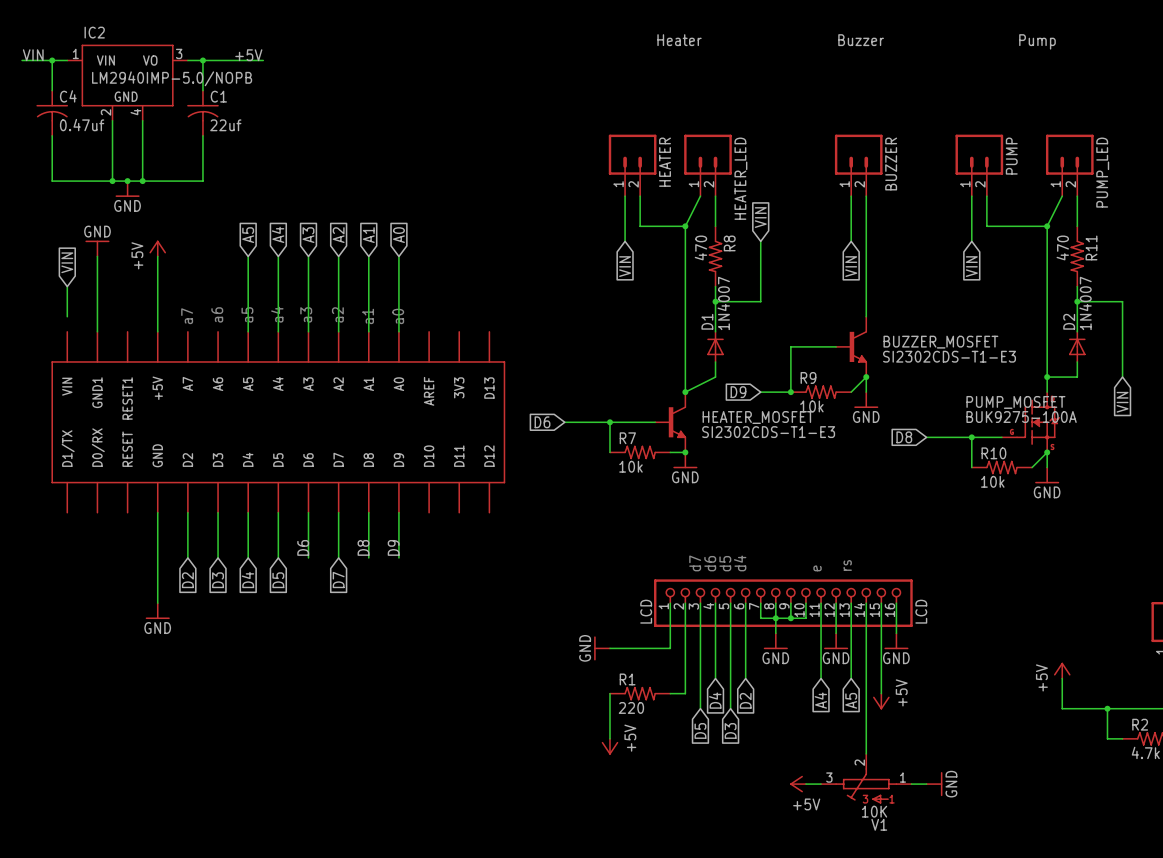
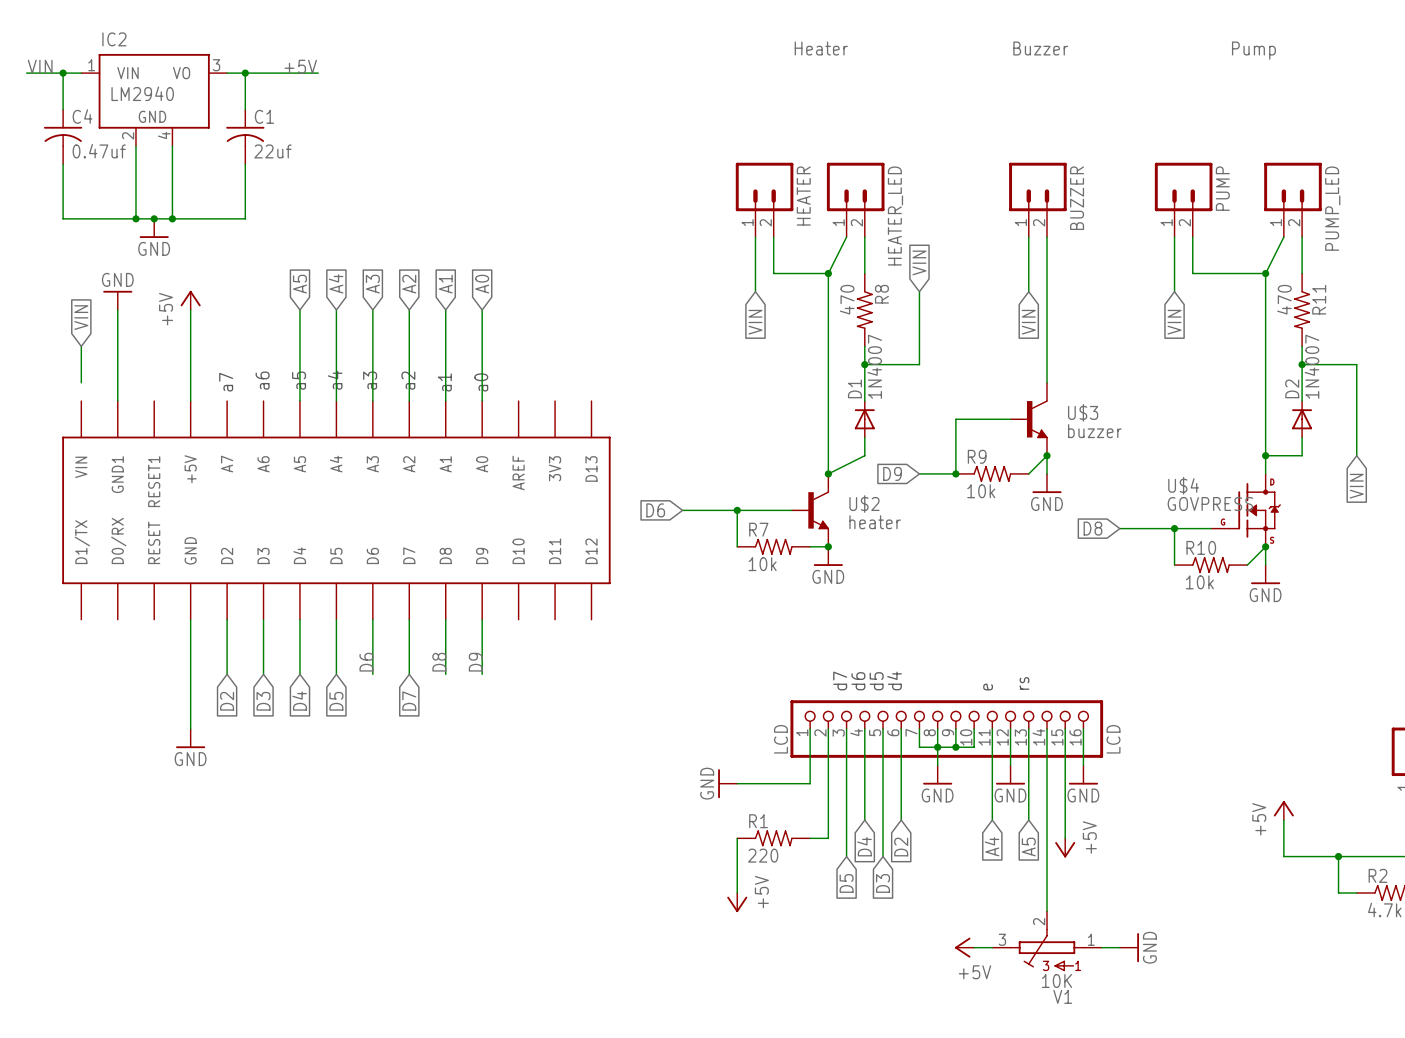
IC2 value: LM2940IMP-5.0/NOPB (172, 78) -> LM2940 (142, 93)
BUZZER_MOSFET name: BUZZER_MOSFET (940, 342) -> U$3 (1083, 412)
BUZZER_MOSFET value: SI2302CDS-T1-E3 (949, 356) -> buzzer (1094, 431)
PUMP_MOSFET name: PUMP_MOSFET (1015, 402) -> U$4 (1183, 485)
HEATER_MOSFET name: HEATER_MOSFET (758, 417) -> U$2 (864, 504)
PUMP_MOSFET value: BUK9275-100A (1021, 417) -> GOVPRESS (1210, 504)
HEATER_MOSFET value: SI2302CDS-T1-E3 (768, 432) -> heater (875, 522)

